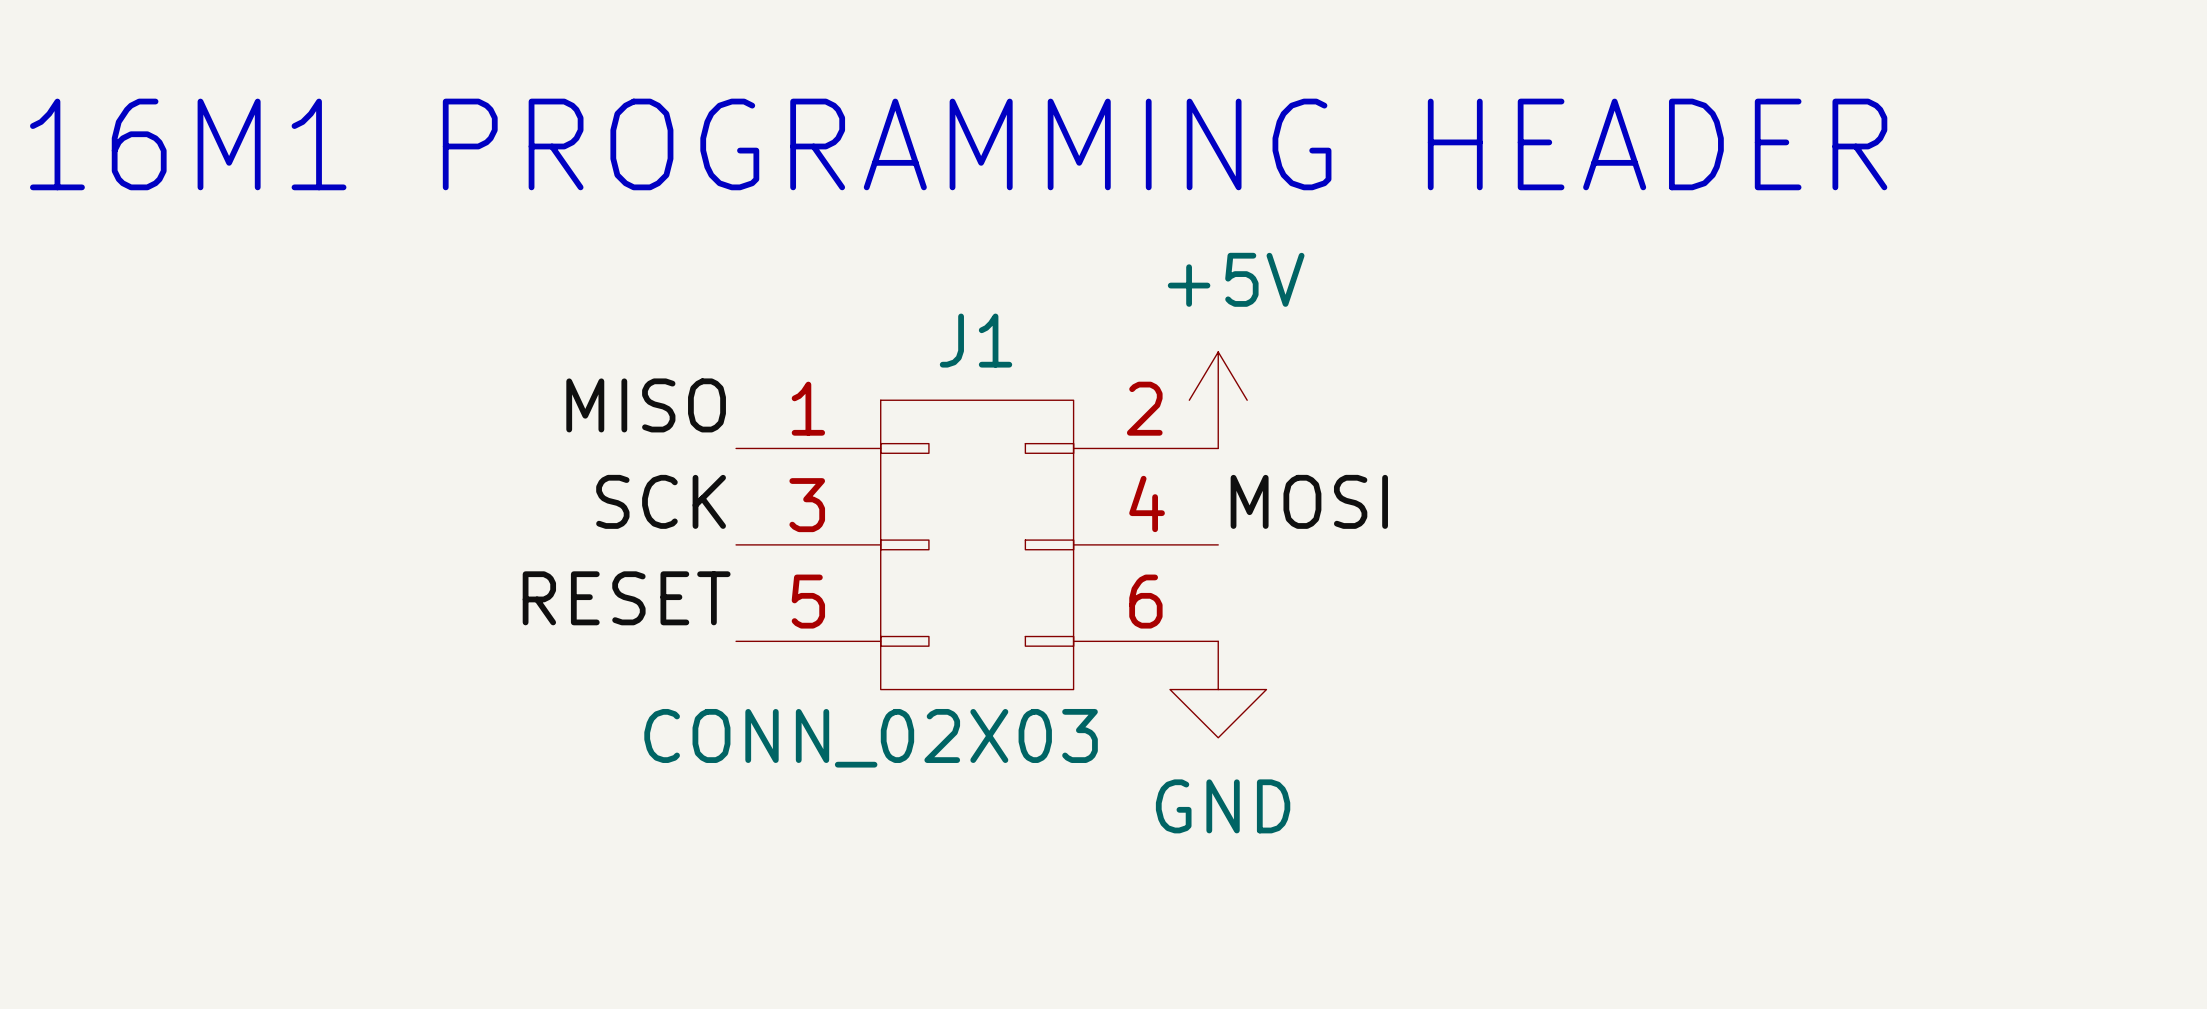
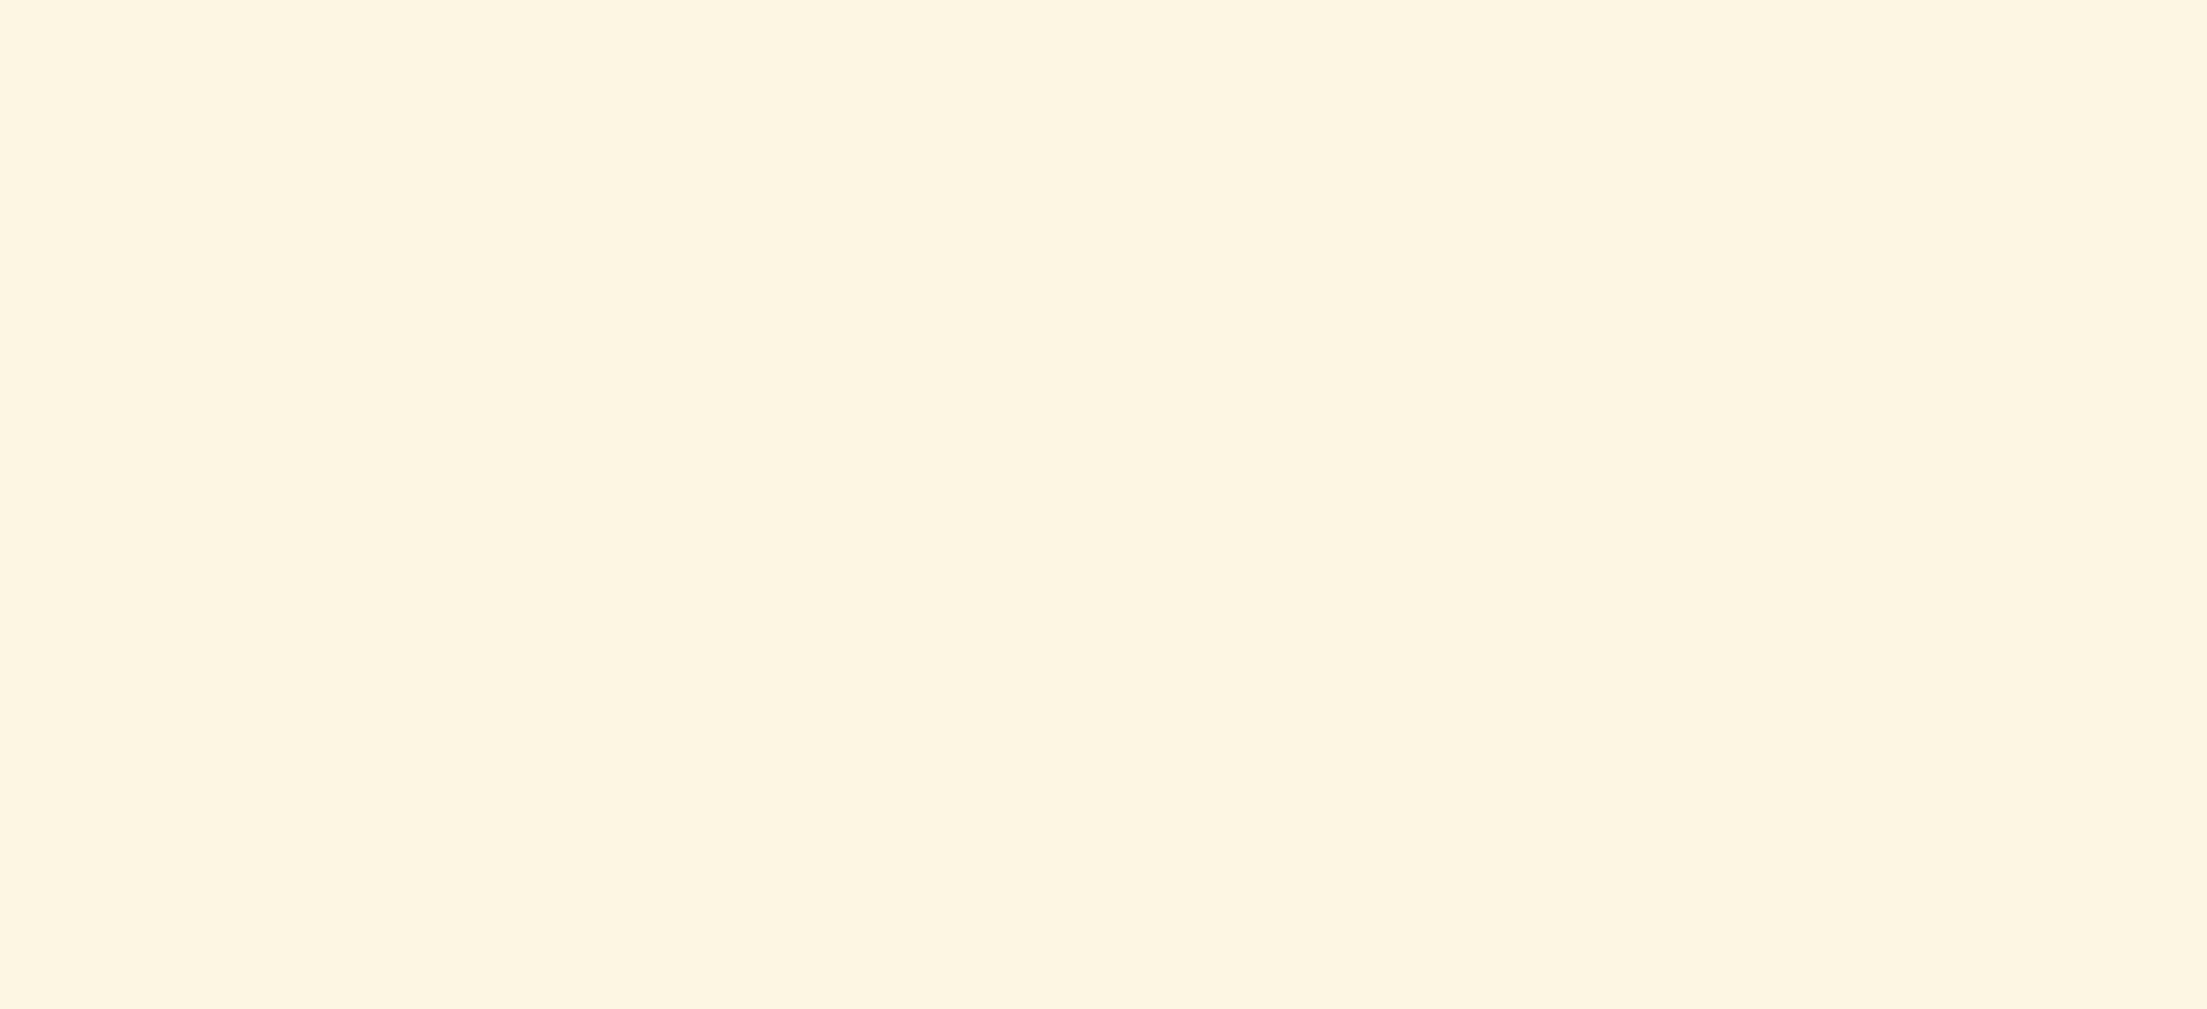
text: 16M1 PROGRAMMING HEADER (958, 144) -> none
power symbol: +5V (1218, 400) -> none
label: MISO (646, 405) -> none
label: SCK (661, 501) -> none
label: MOSI (1309, 501) -> none
J1: CONN_02X03 (977, 544) -> none
label: RESET (626, 598) -> none
power symbol: GND (1218, 689) -> none

